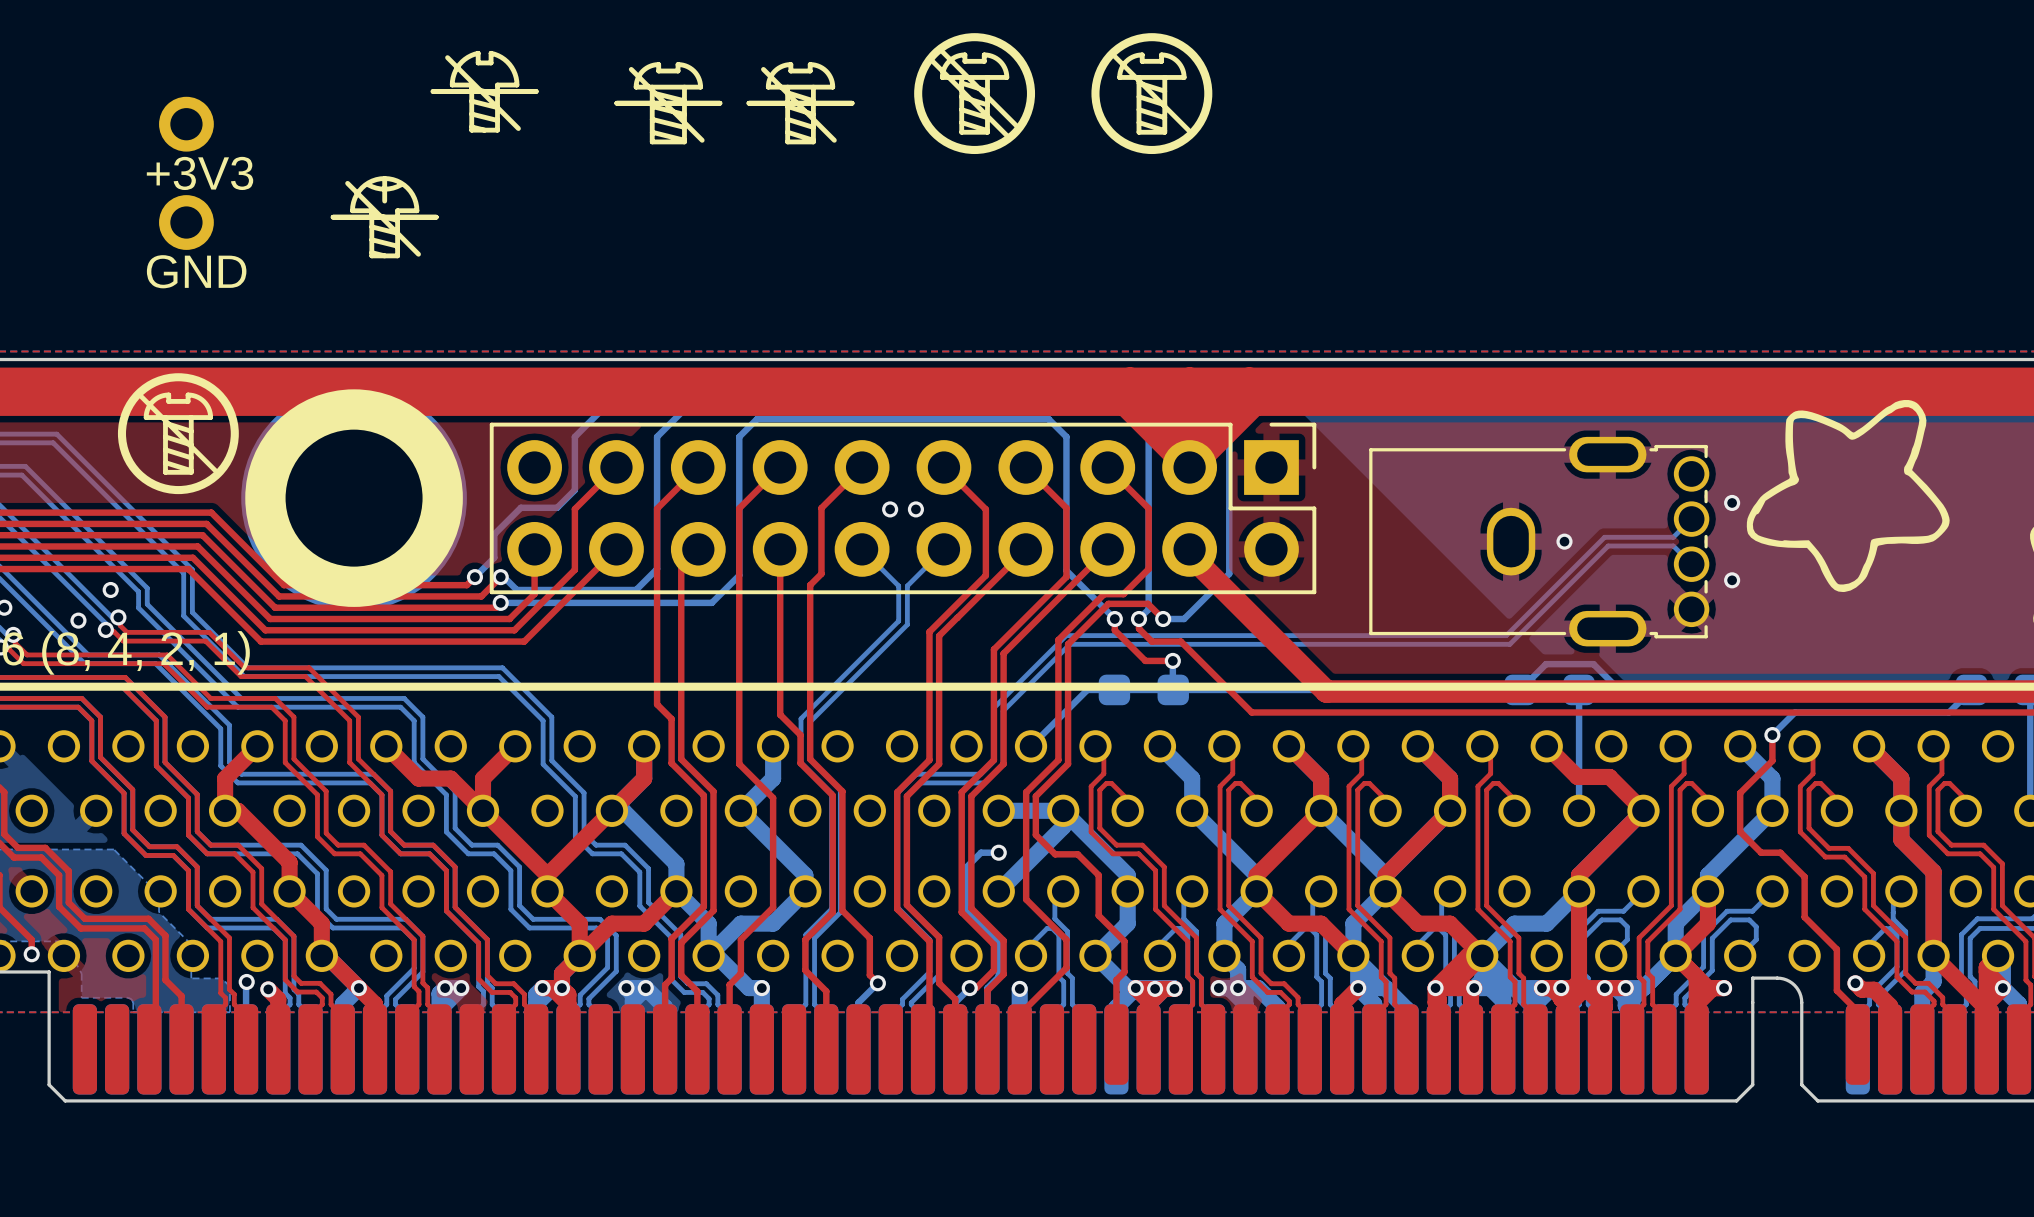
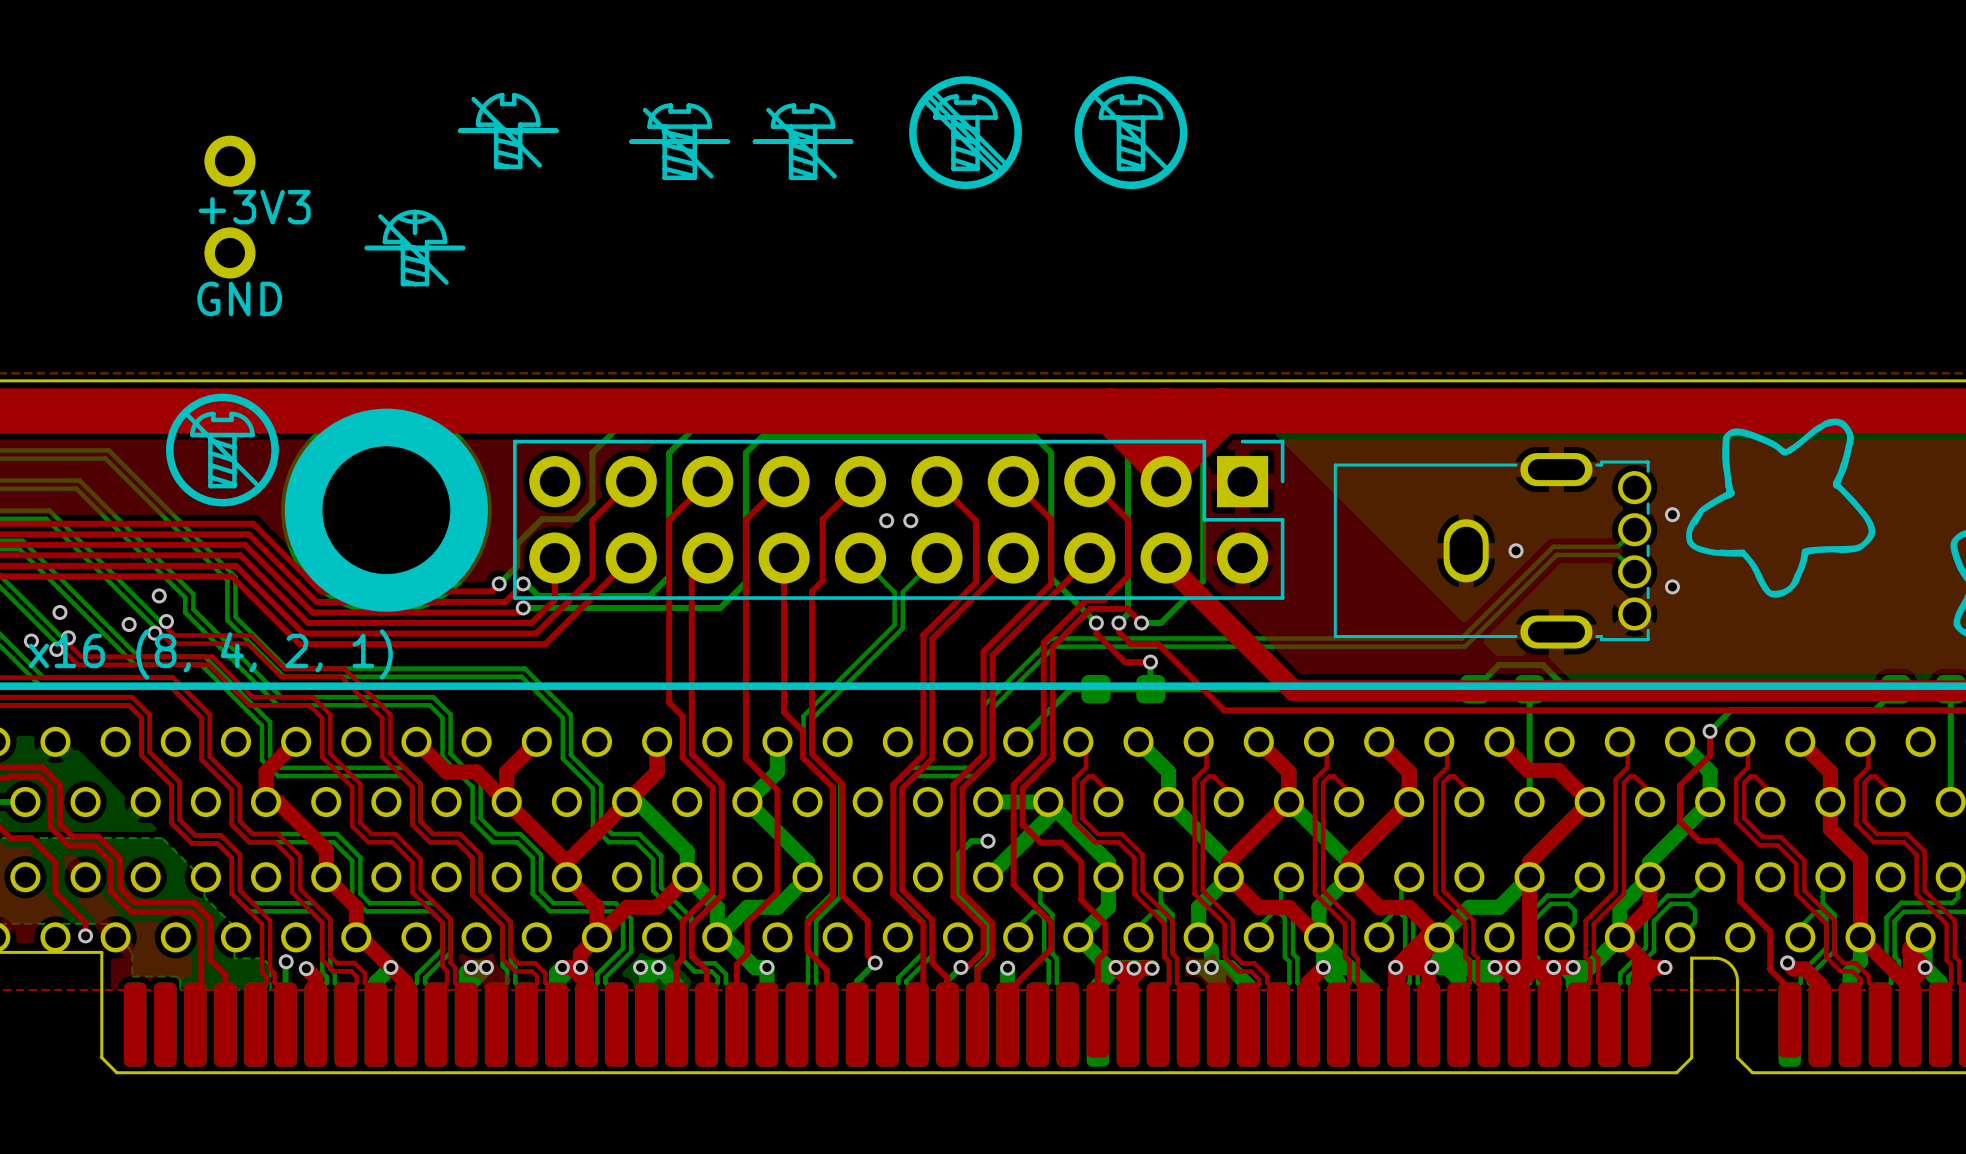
line: none -> (929, 96) (1003, 170)

